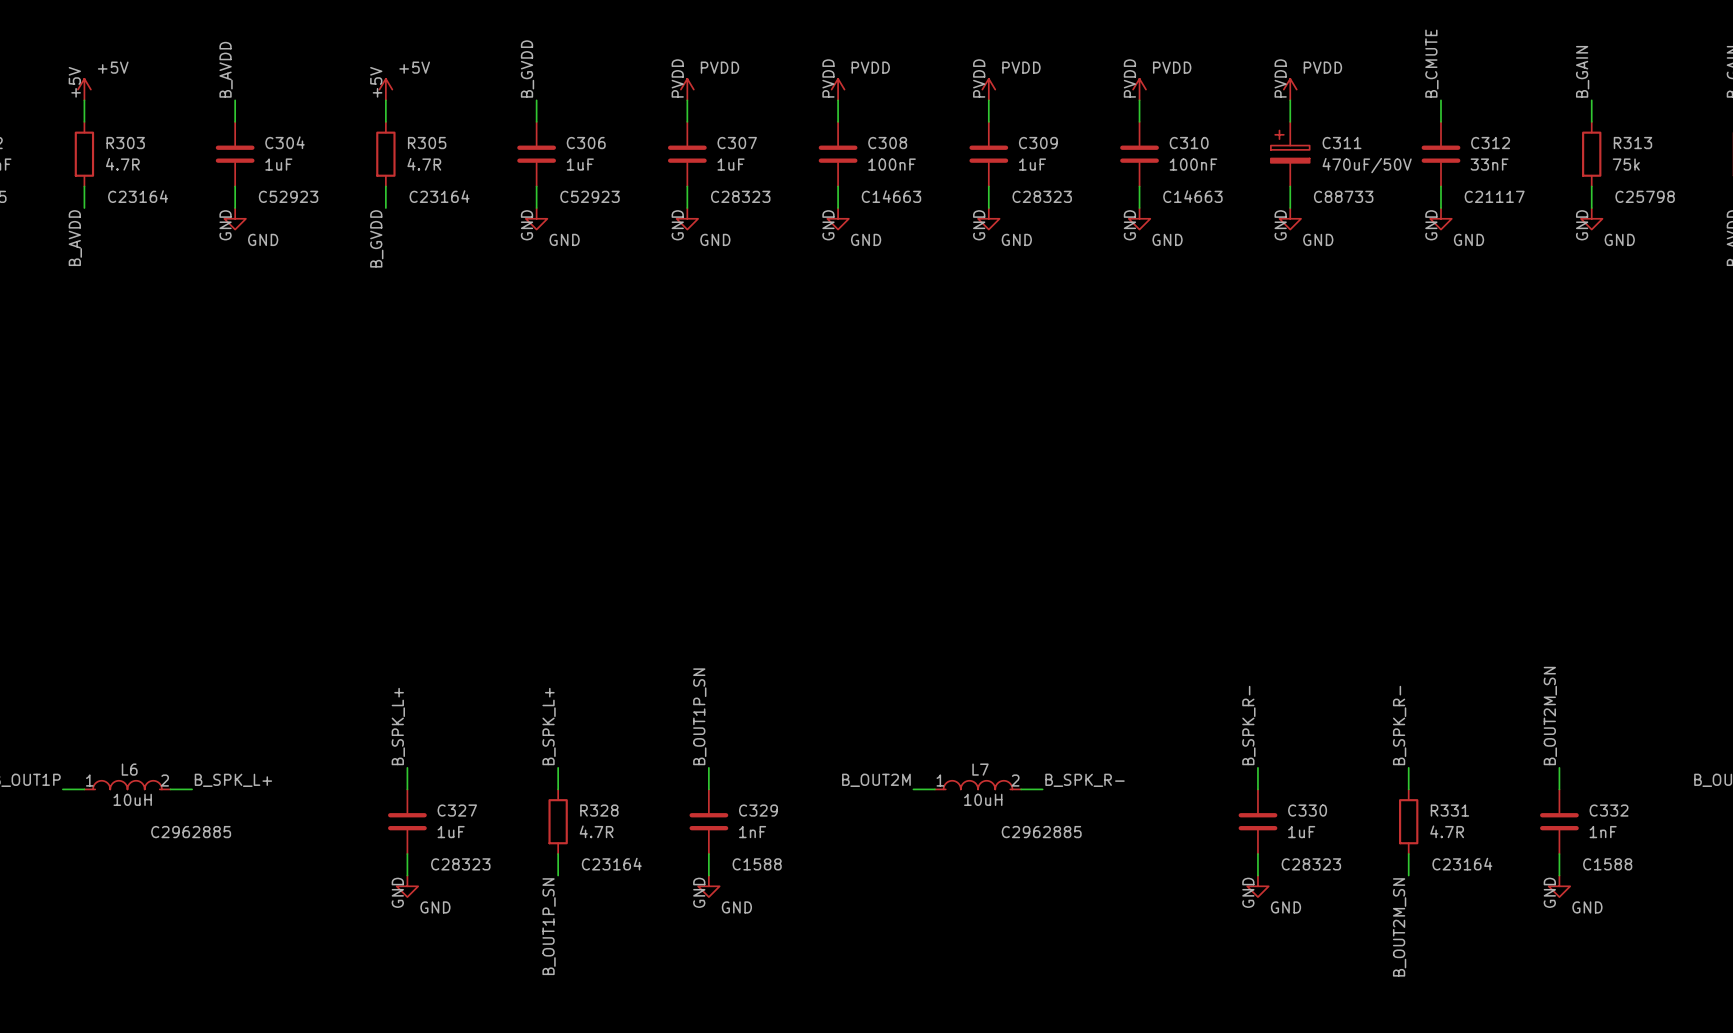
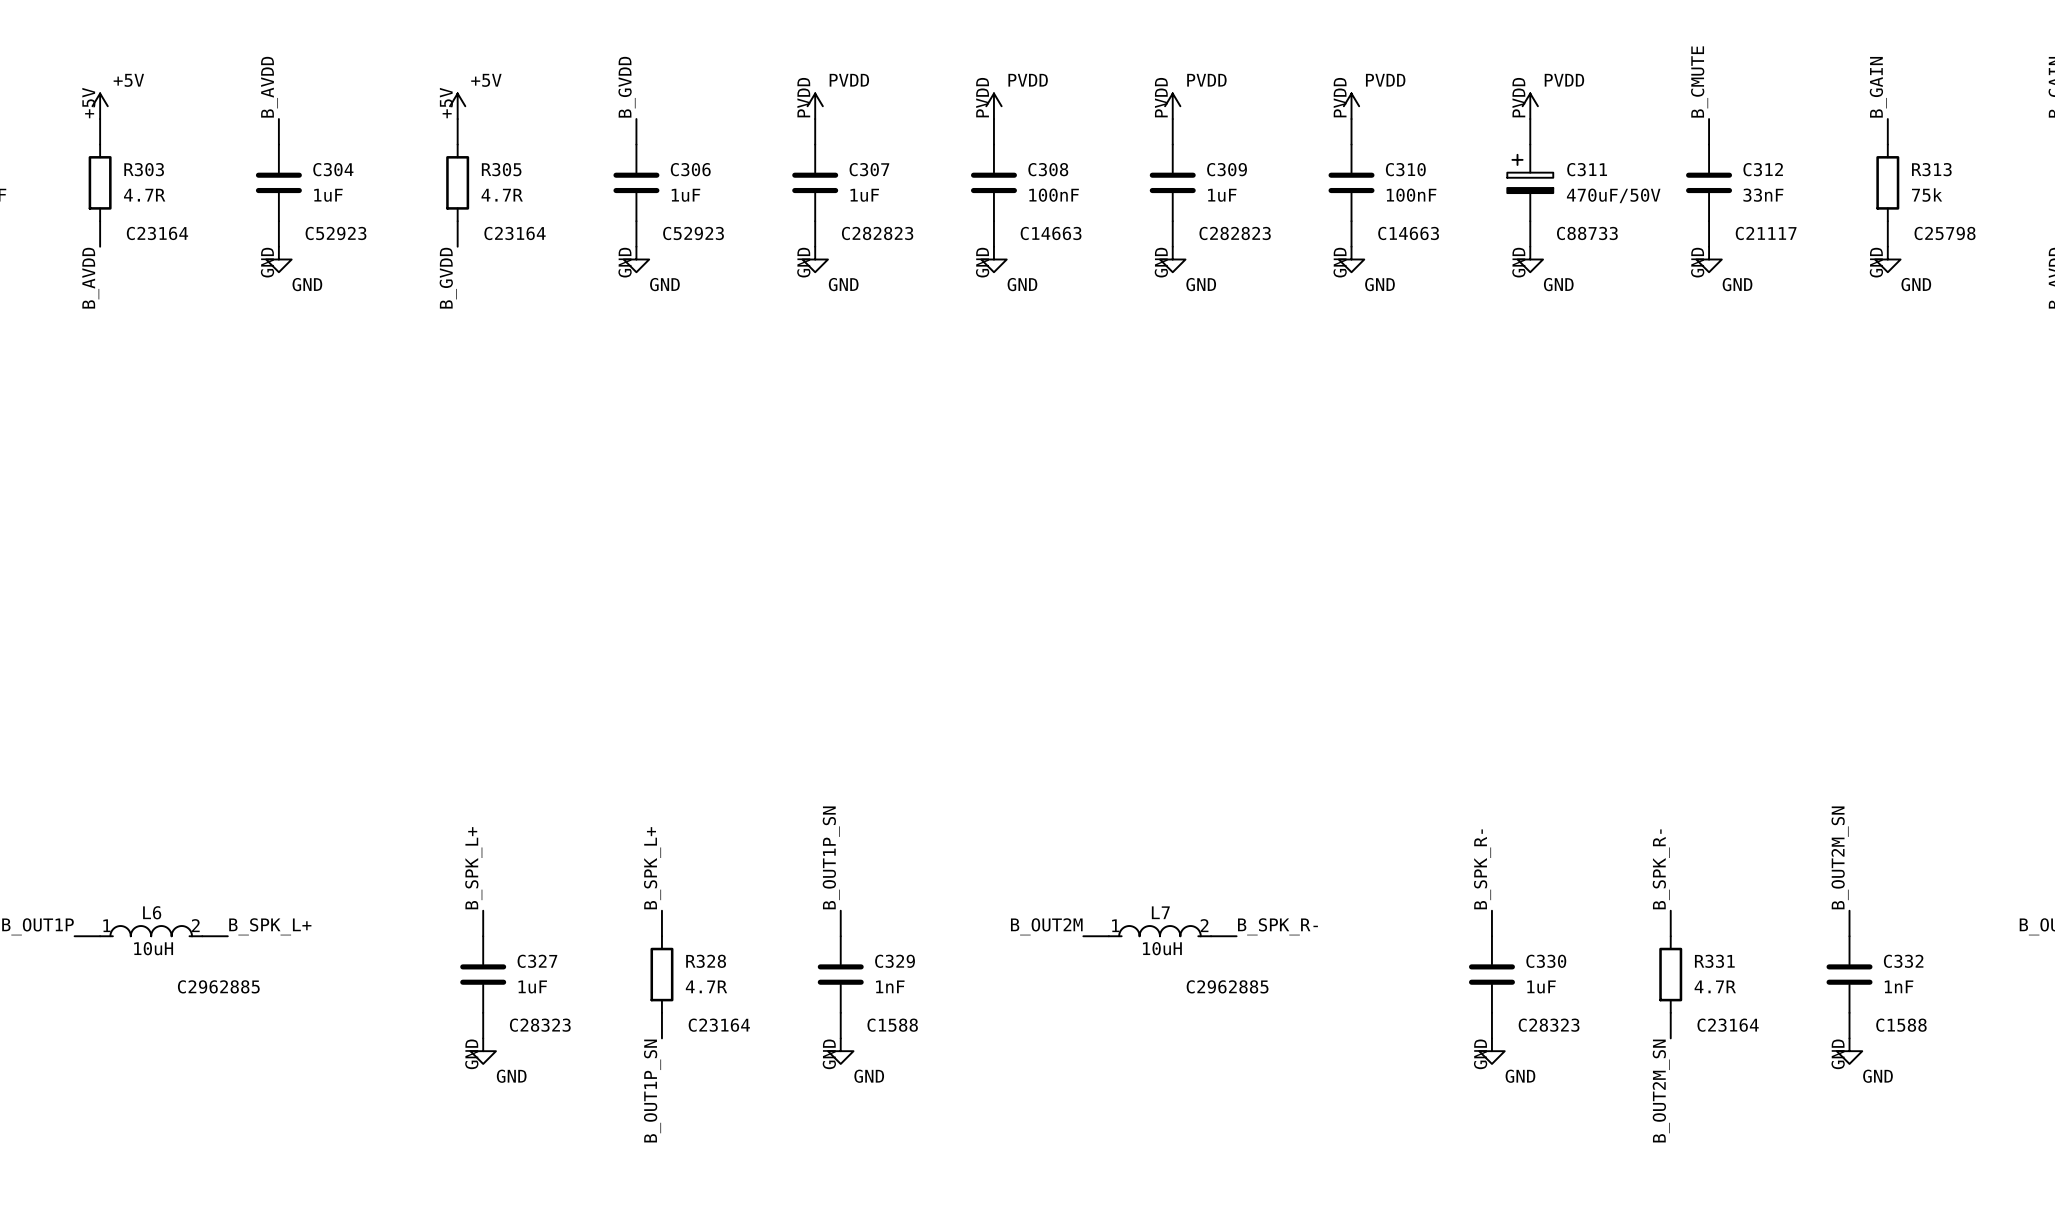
C307 text: C28323 (740, 196) -> C282823 (877, 233)
C309 text: C28323 (1042, 196) -> C282823 (1235, 233)

